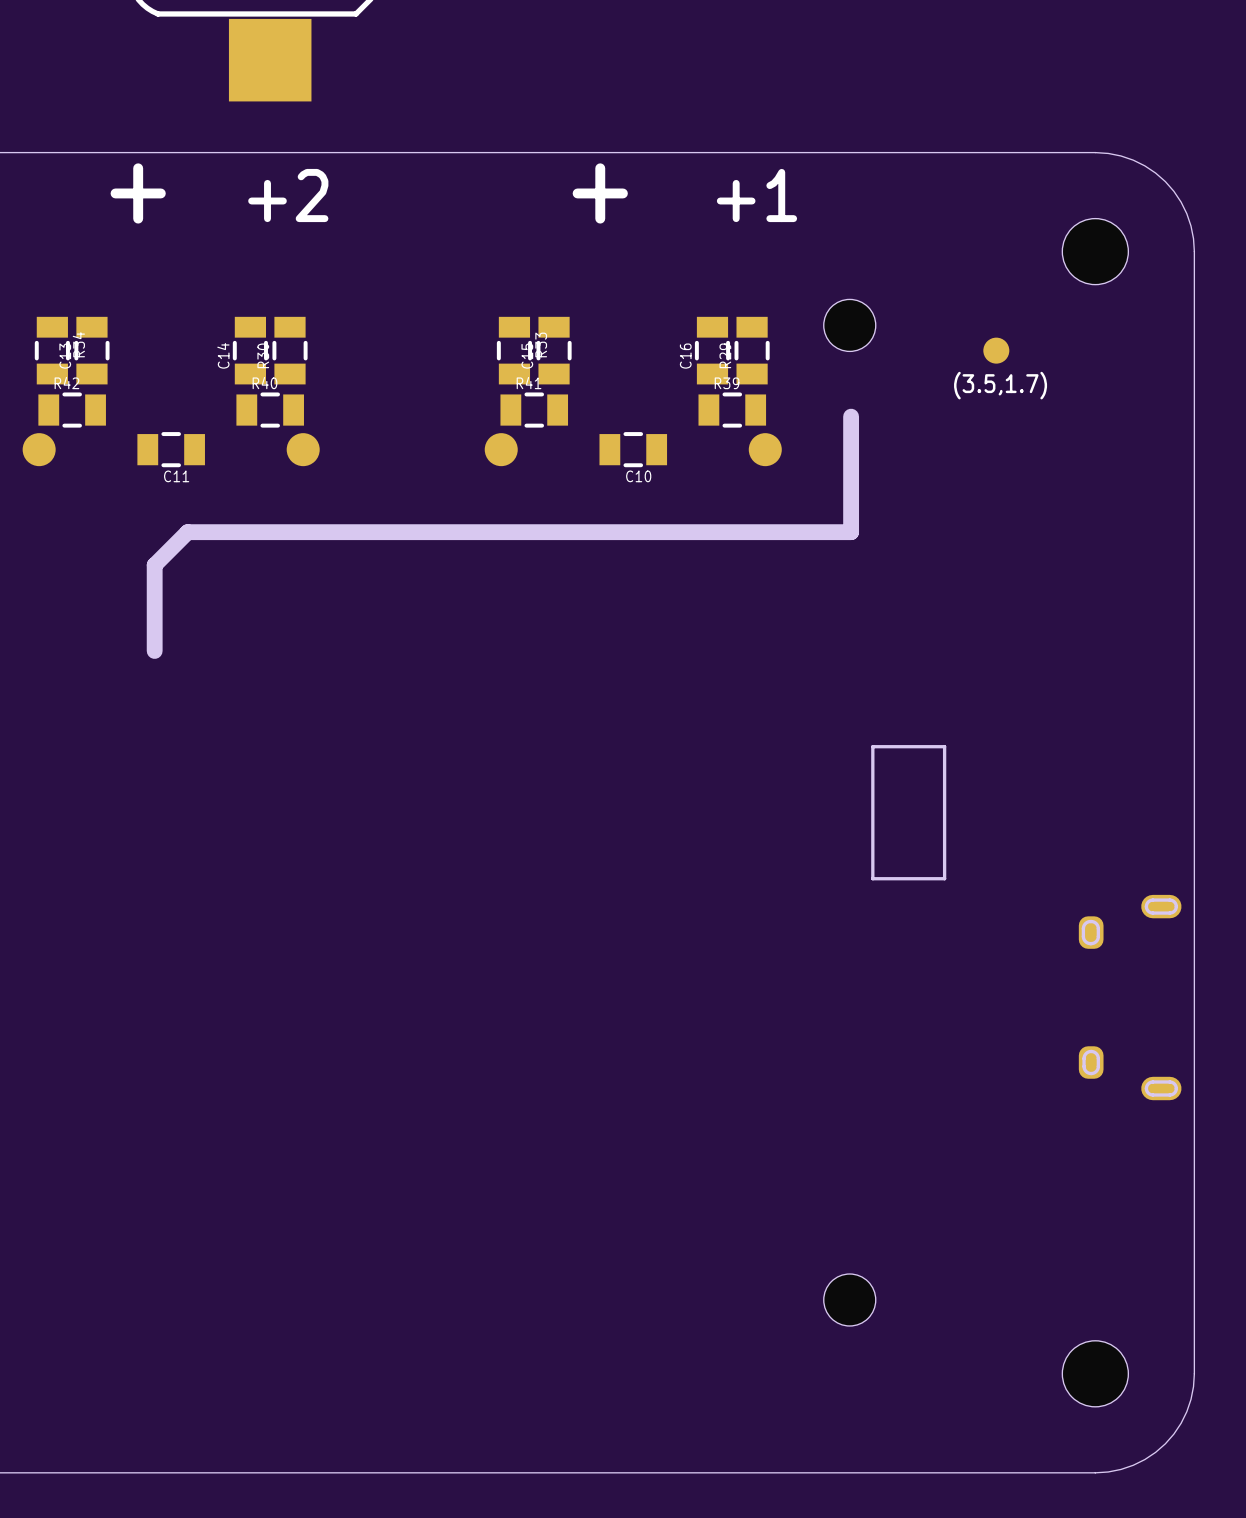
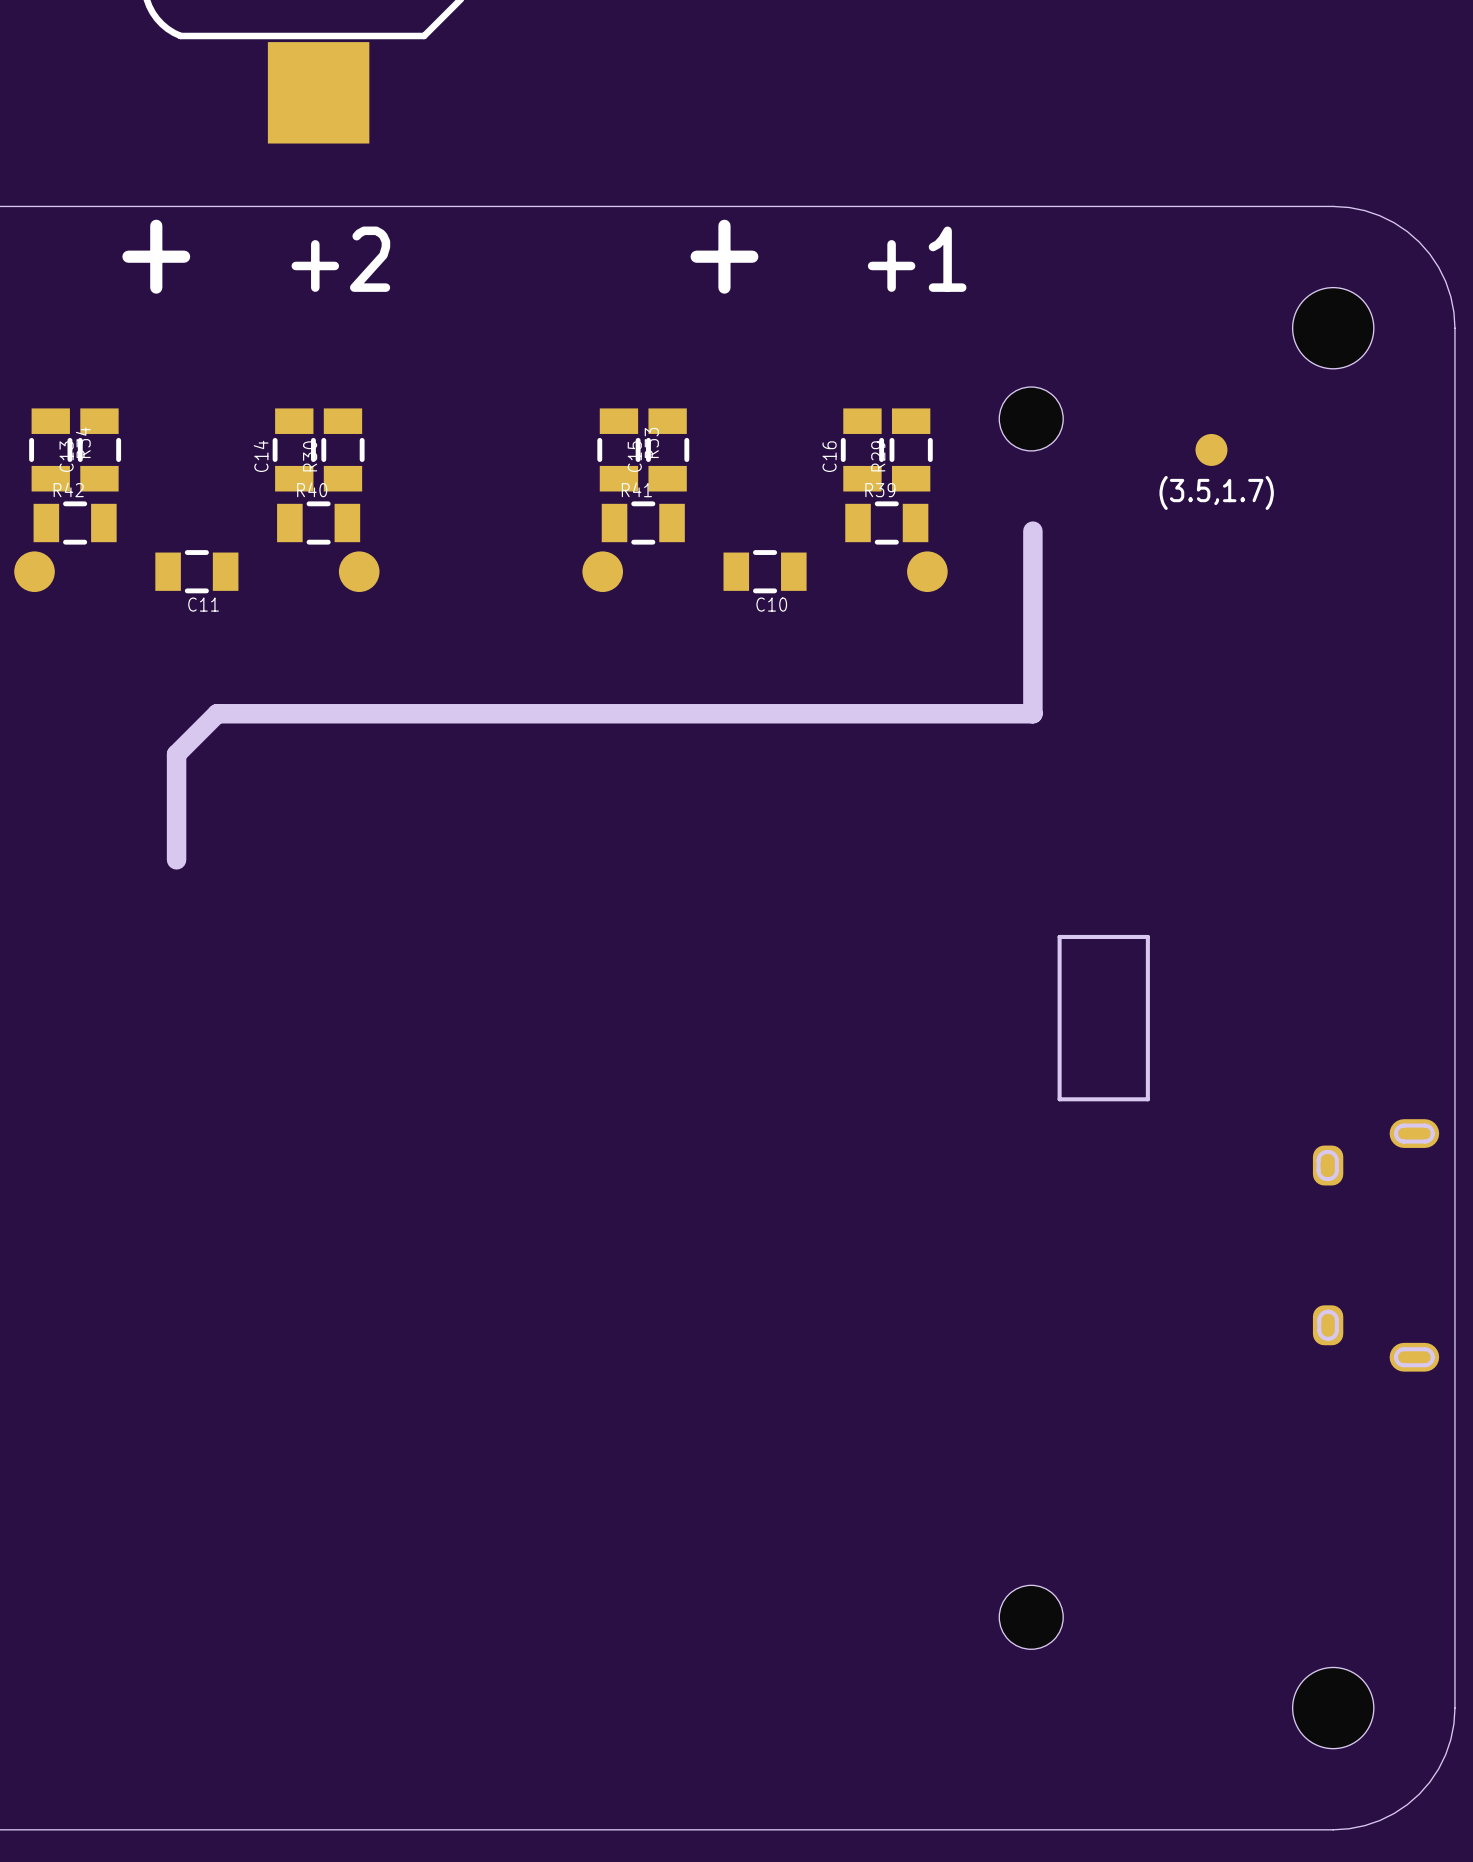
board edge: (851, 532) (187, 532) (154, 565) (154, 598) -> (1032, 673) (1032, 713) (217, 713) (176, 754)
board edge: none -> (176, 819) (176, 859)

